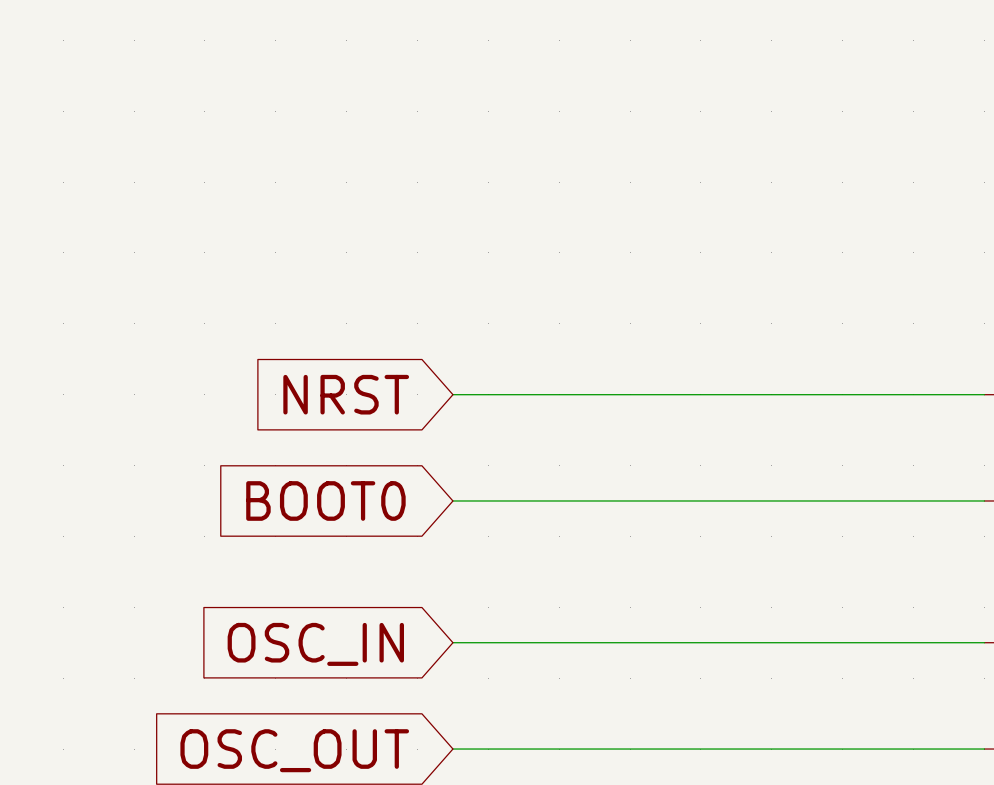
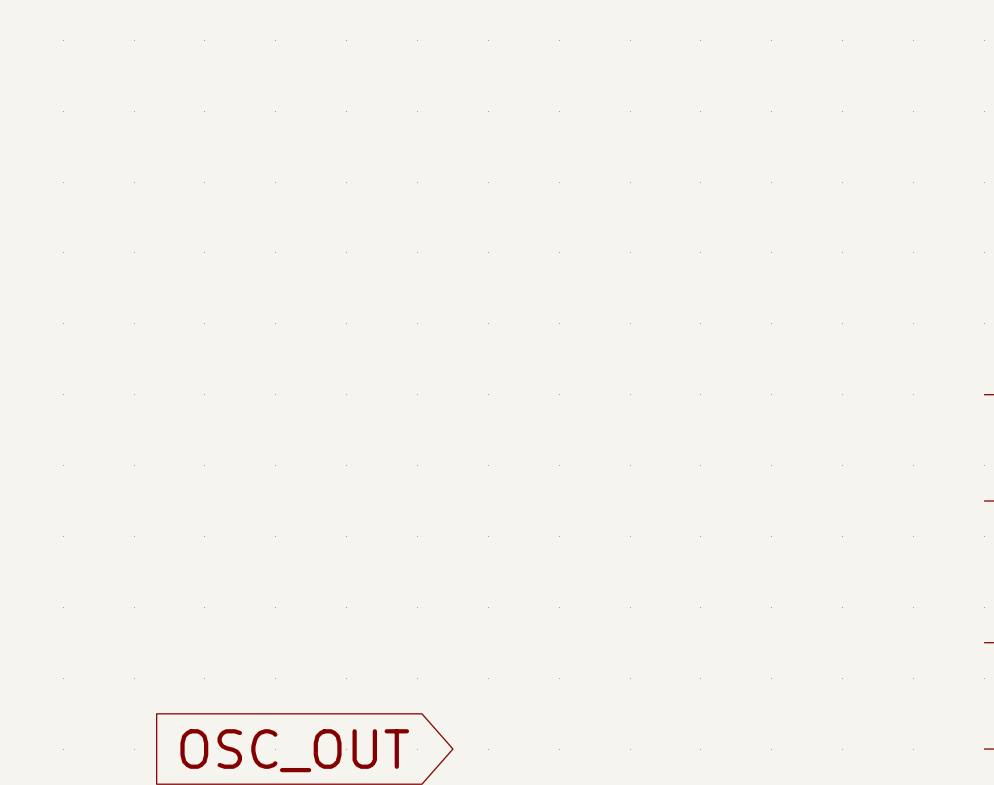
global label: NRST (346, 394) -> none
wire: (452, 394) (984, 394) -> none
global label: BOOT0 (325, 500) -> none
wire: (452, 500) (984, 500) -> none
wire: (452, 642) (984, 642) -> none
global label: OSC_IN (315, 644) -> none
wire: (452, 749) (984, 749) -> none

